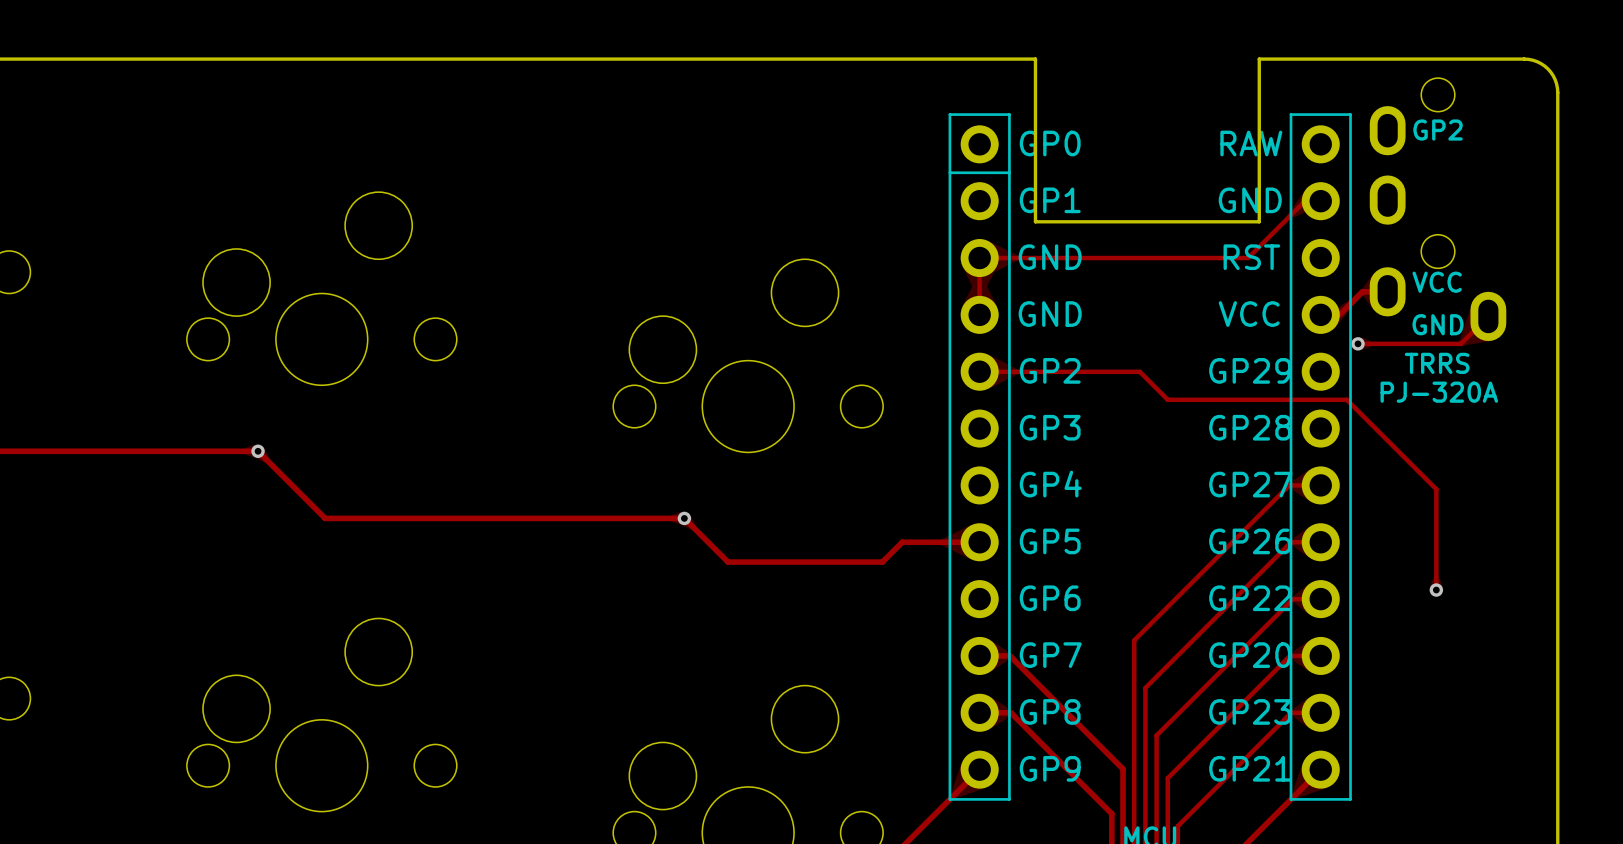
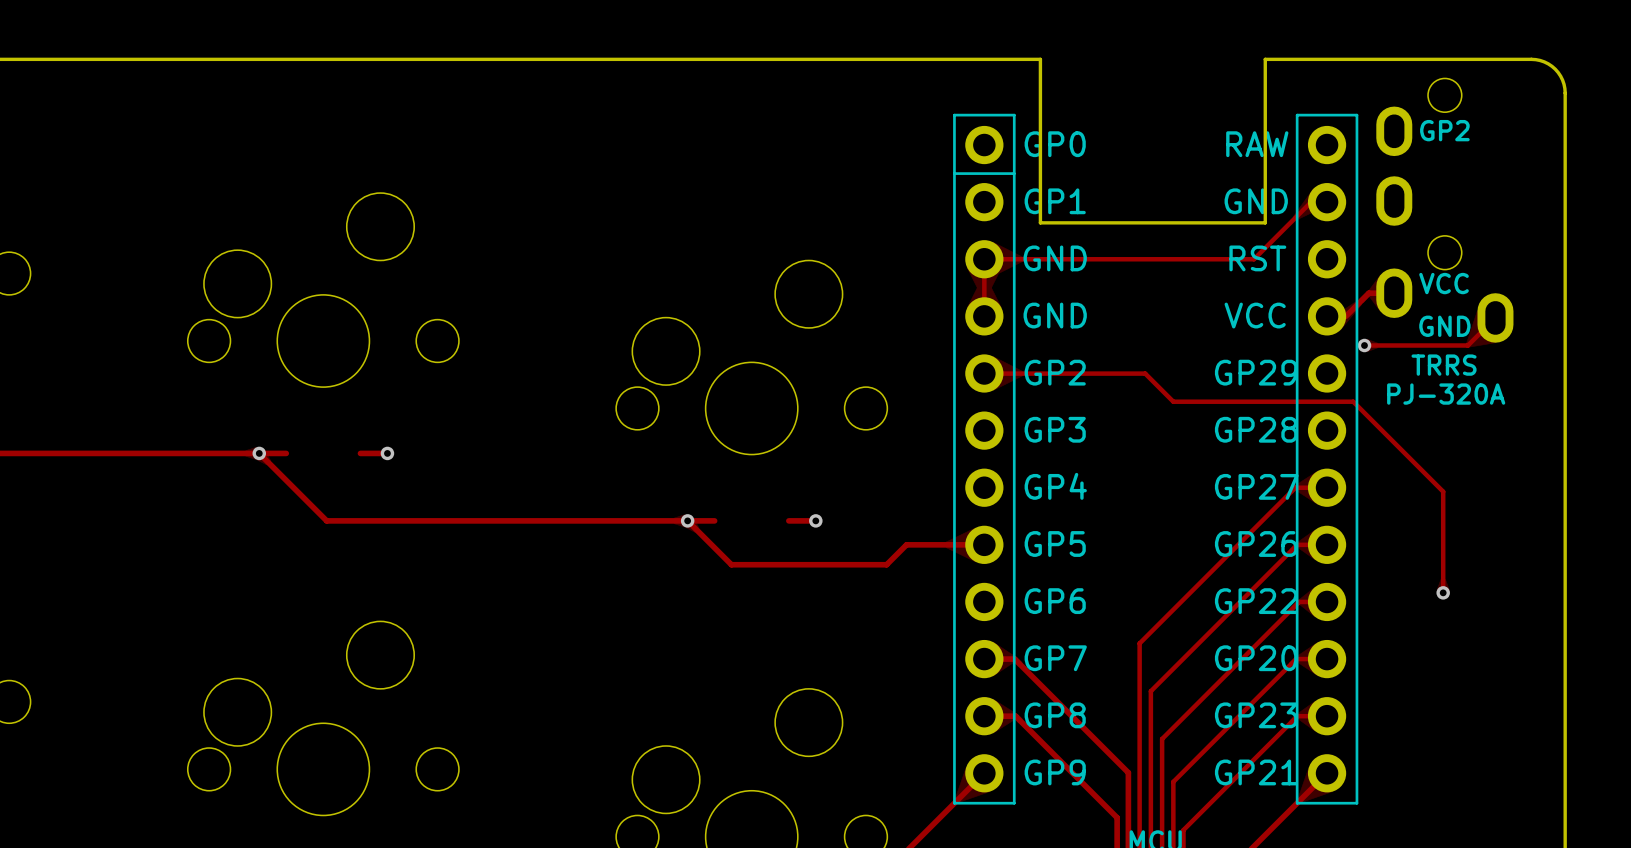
track: none -> (259, 453) (286, 453)
track: none -> (360, 453) (387, 453)
via: none -> (387, 453)
track: none -> (687, 520) (714, 520)
track: none -> (788, 520) (815, 520)
via: none -> (815, 520)

